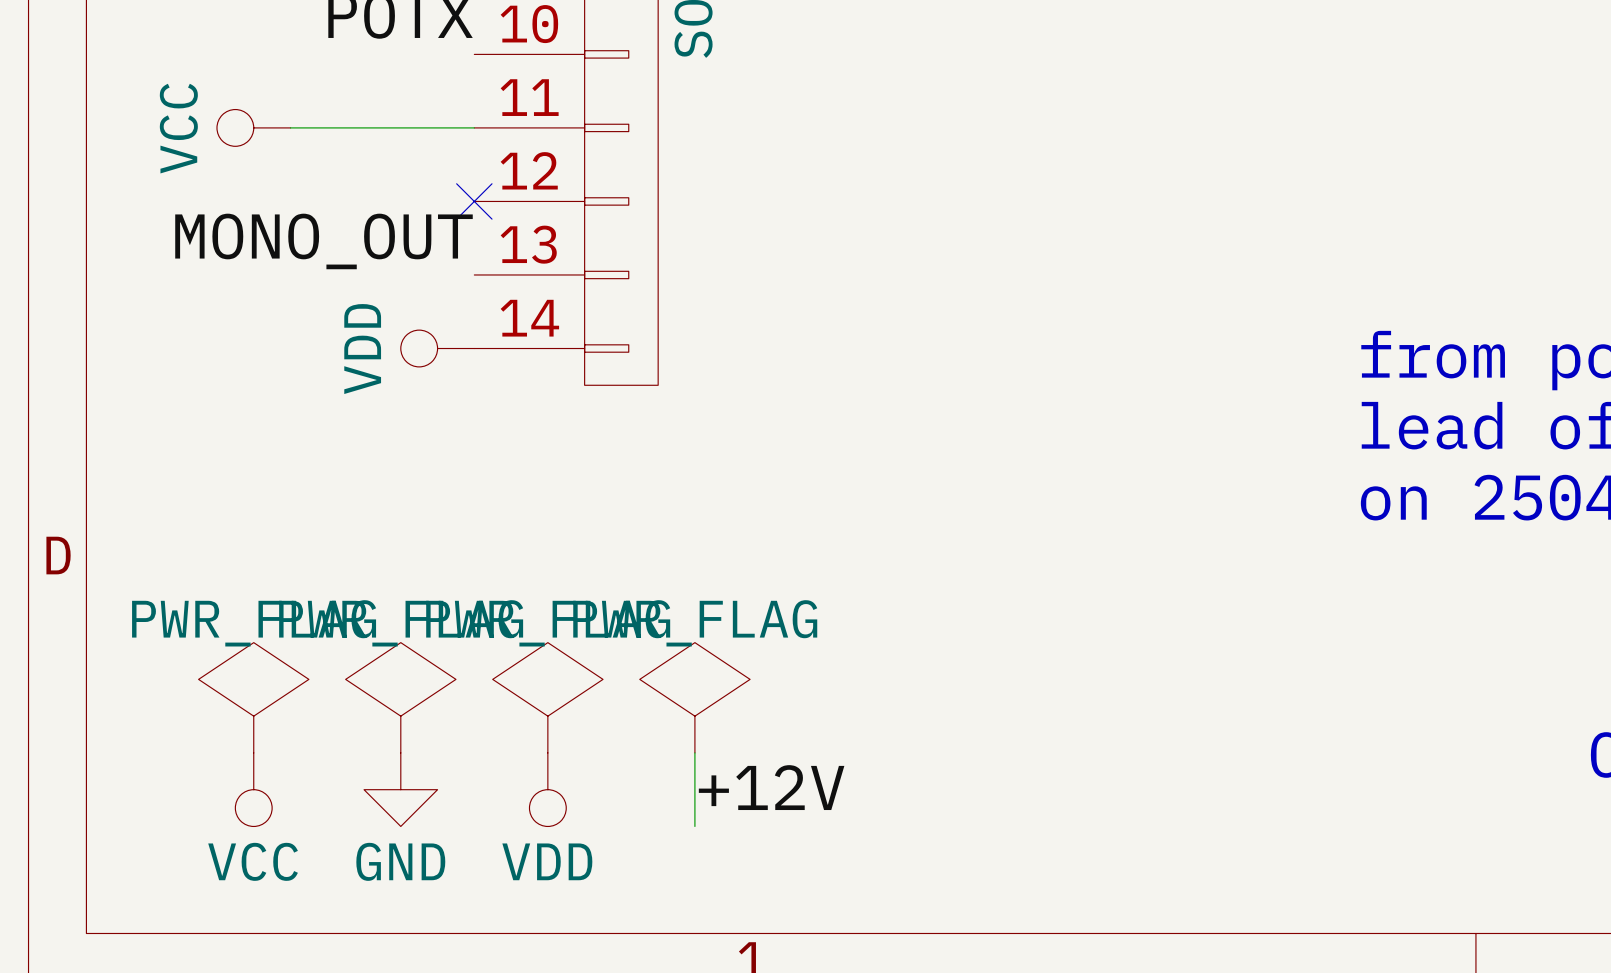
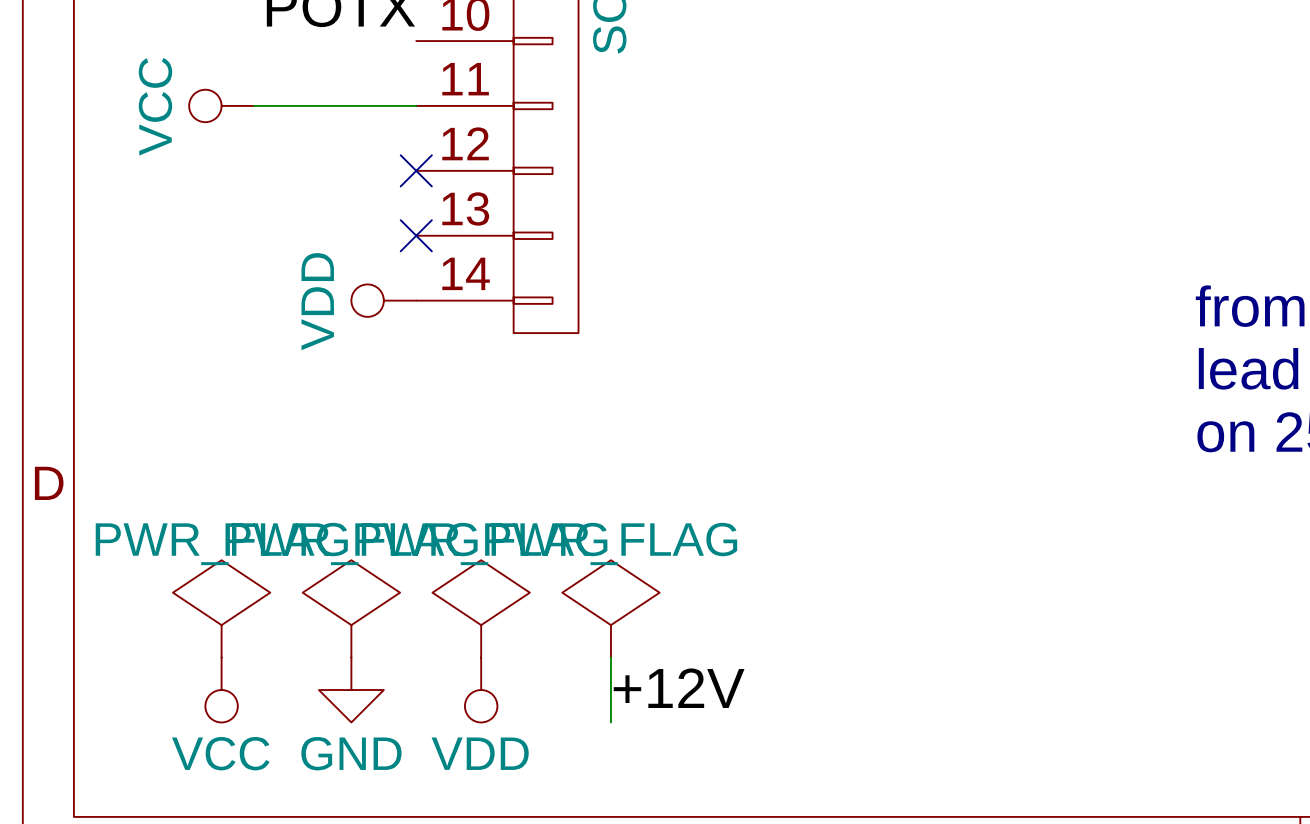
label: MONO_OUT (323, 241) -> none
no-connect mark: none -> (416, 235)

